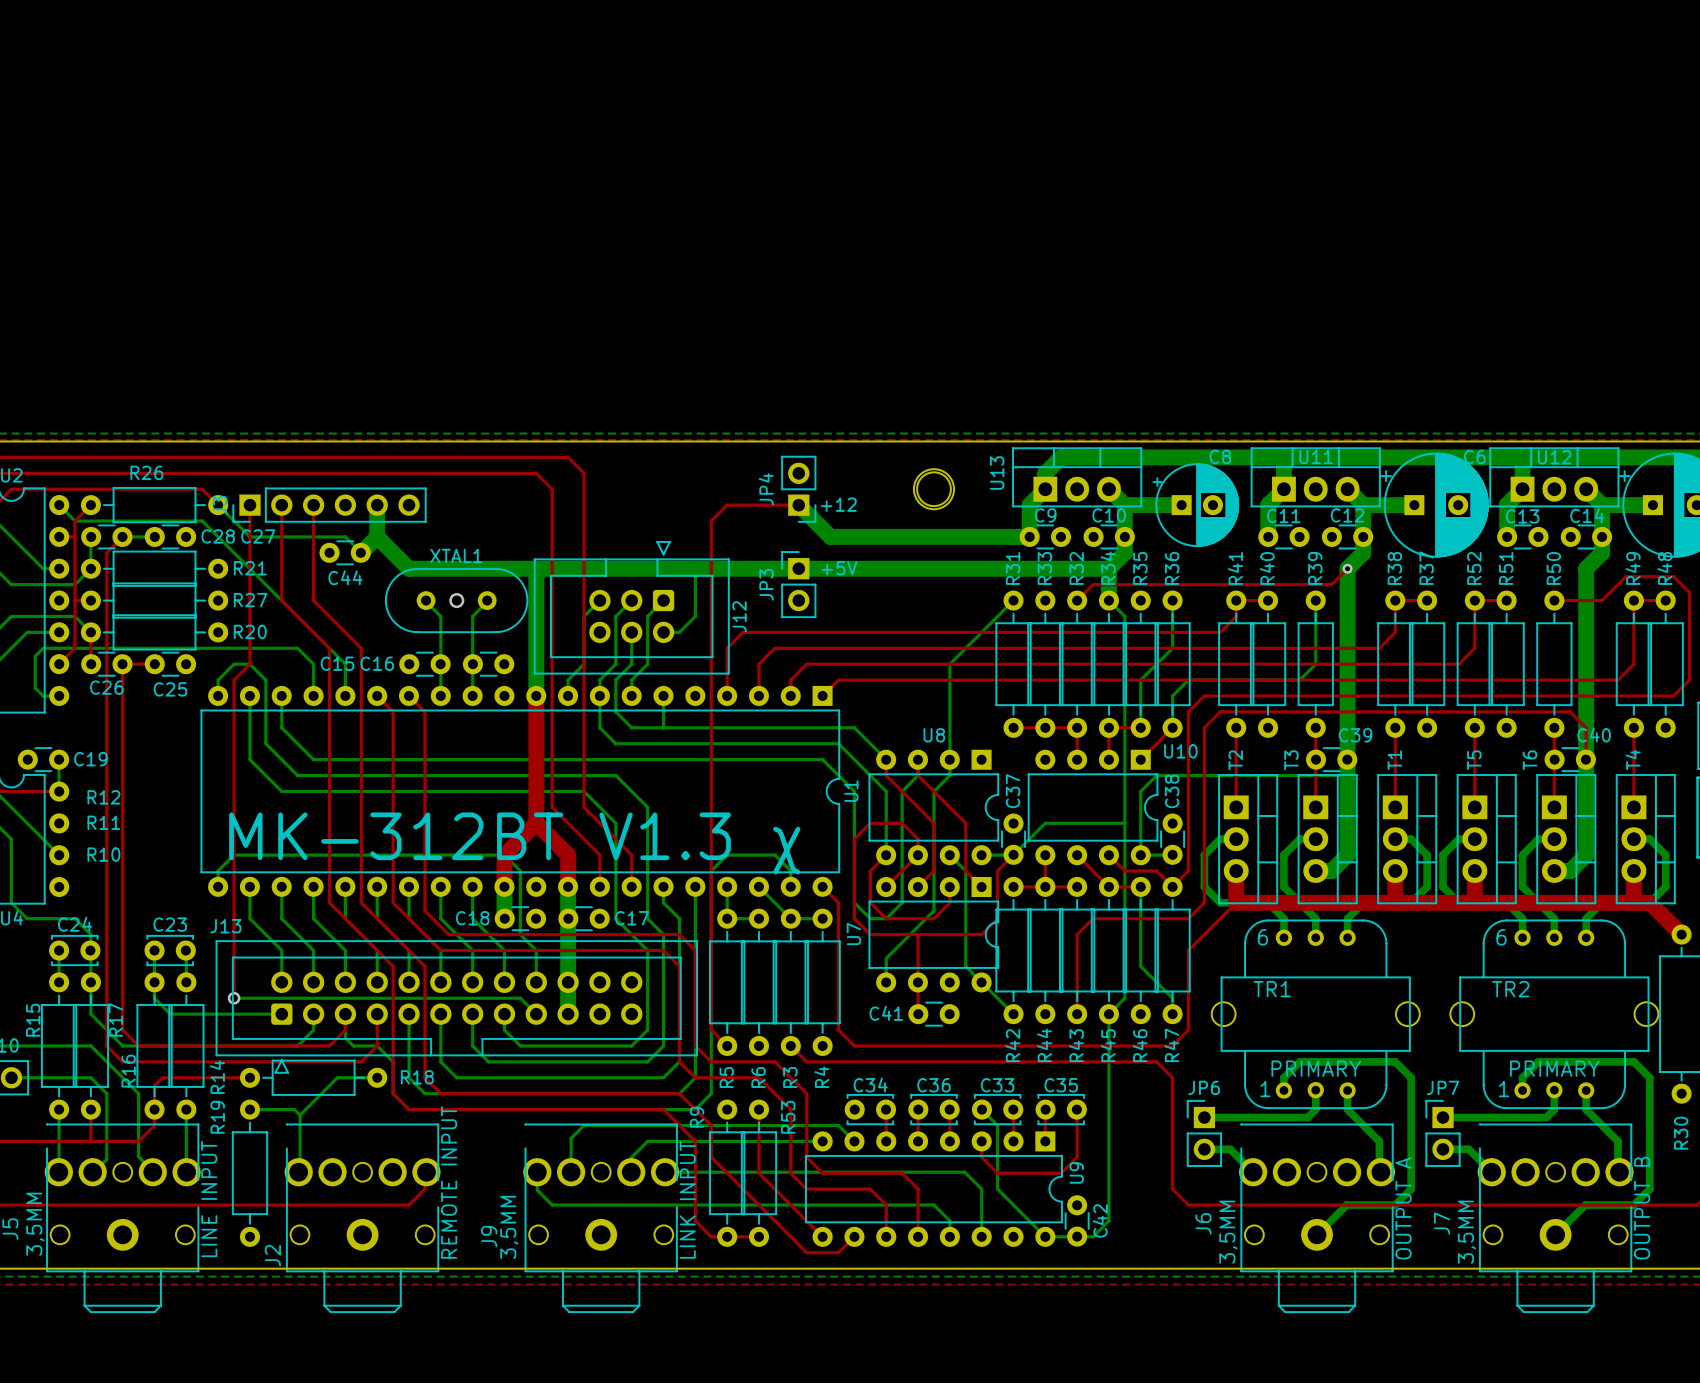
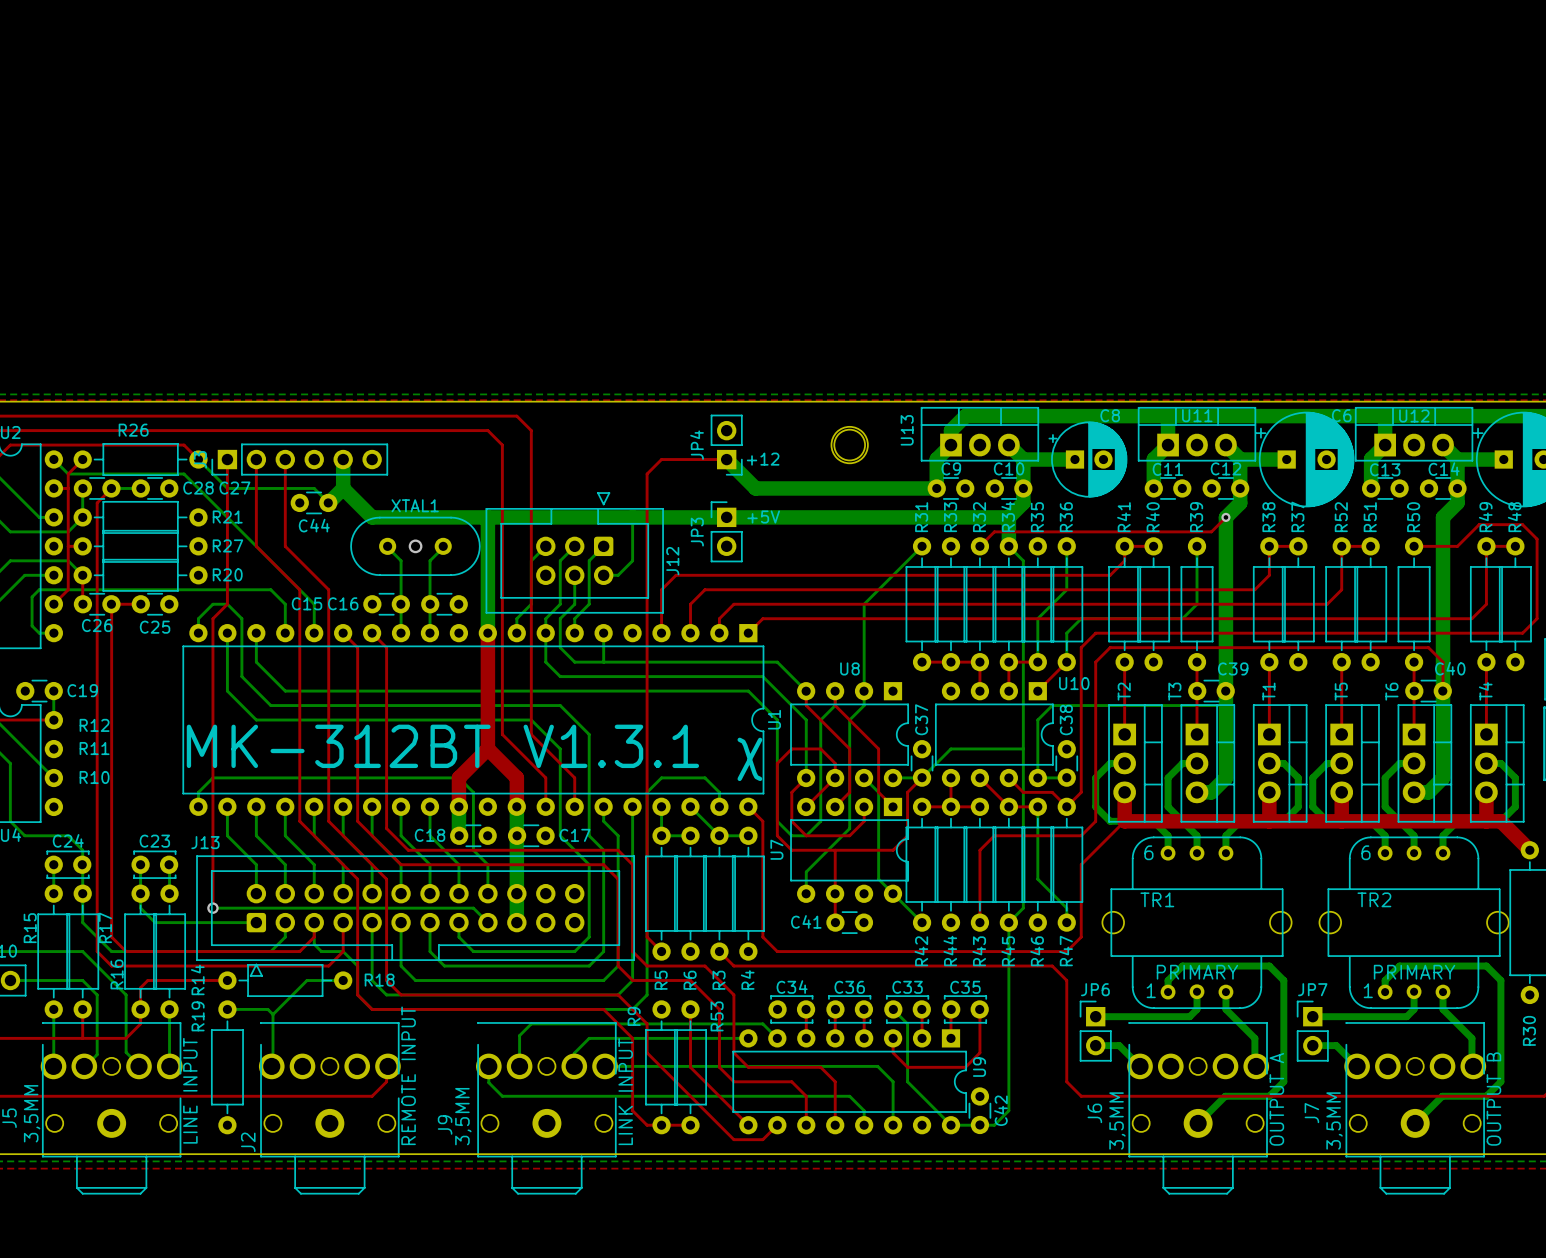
text: MK-312BT V1.3 χ (514, 843) -> MK-312BT V1.3.1 χ (474, 752)

